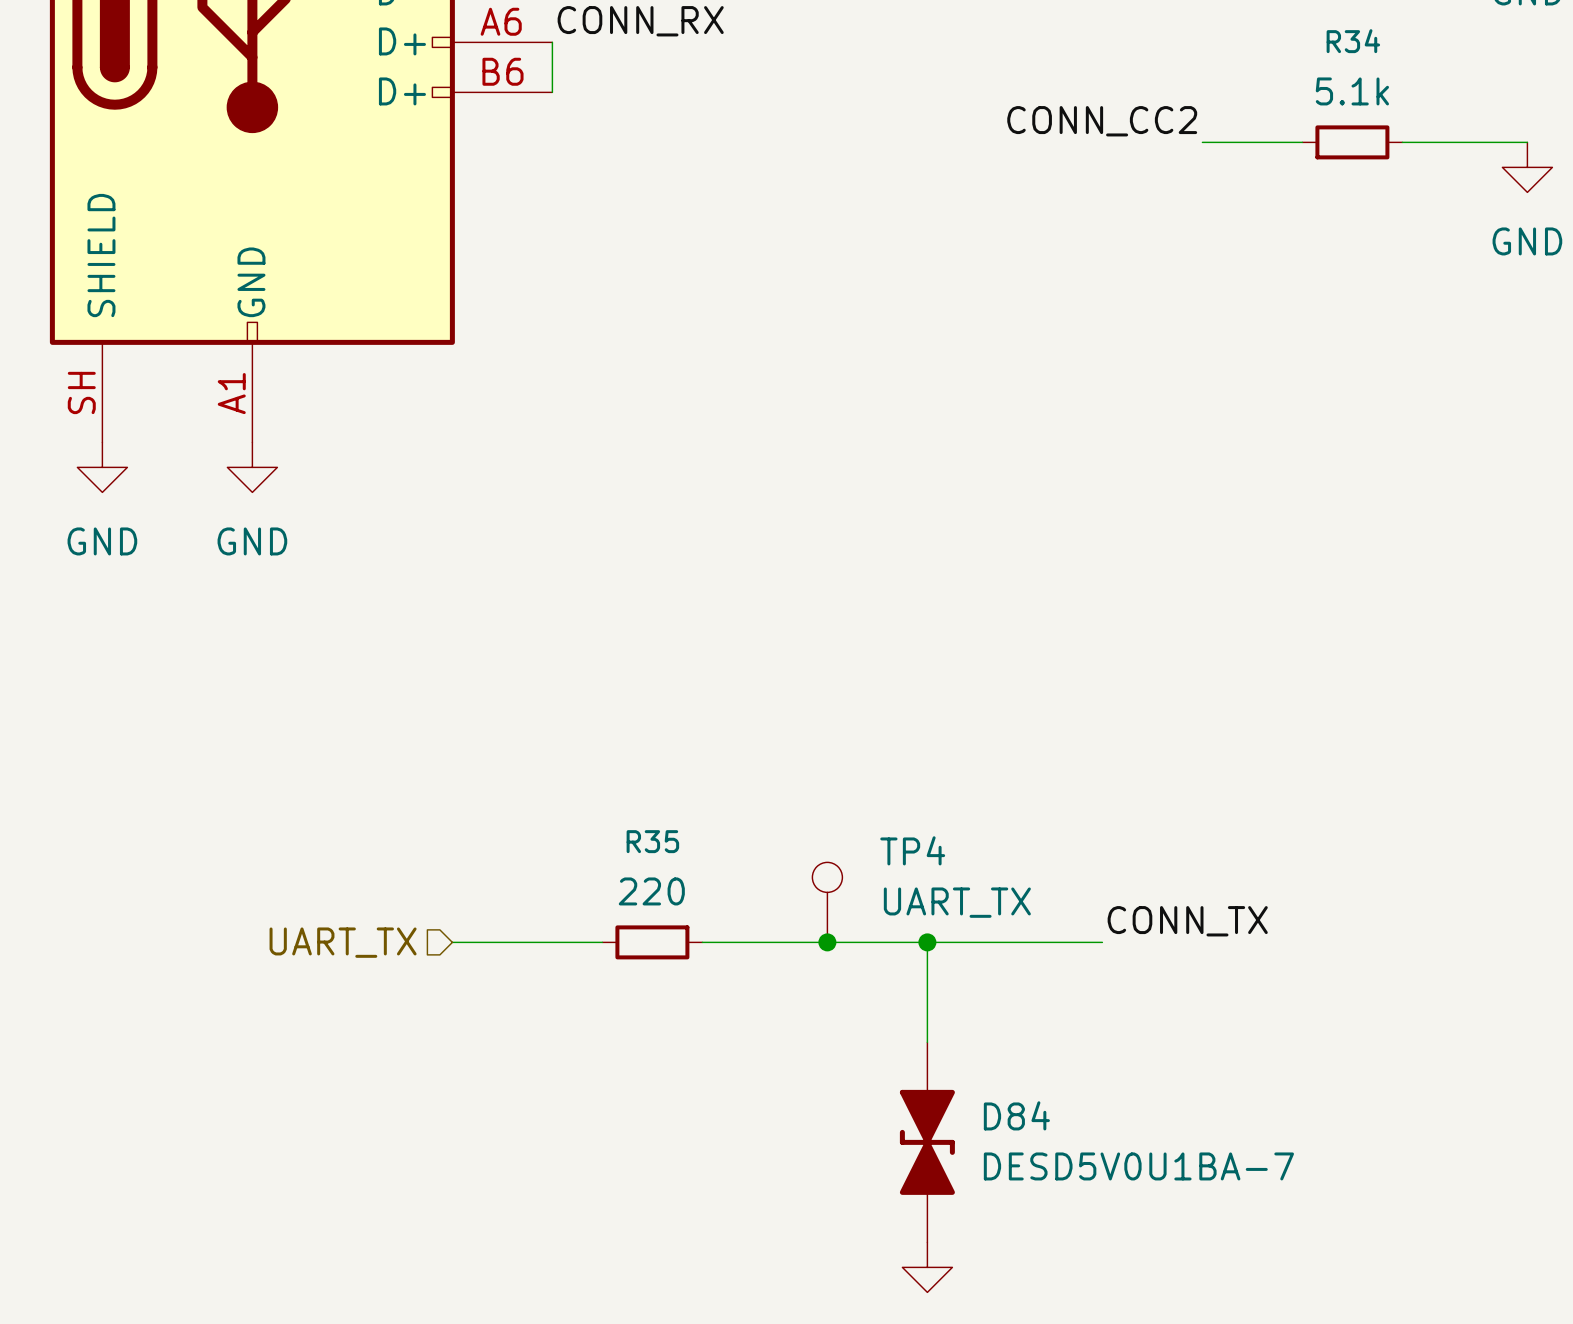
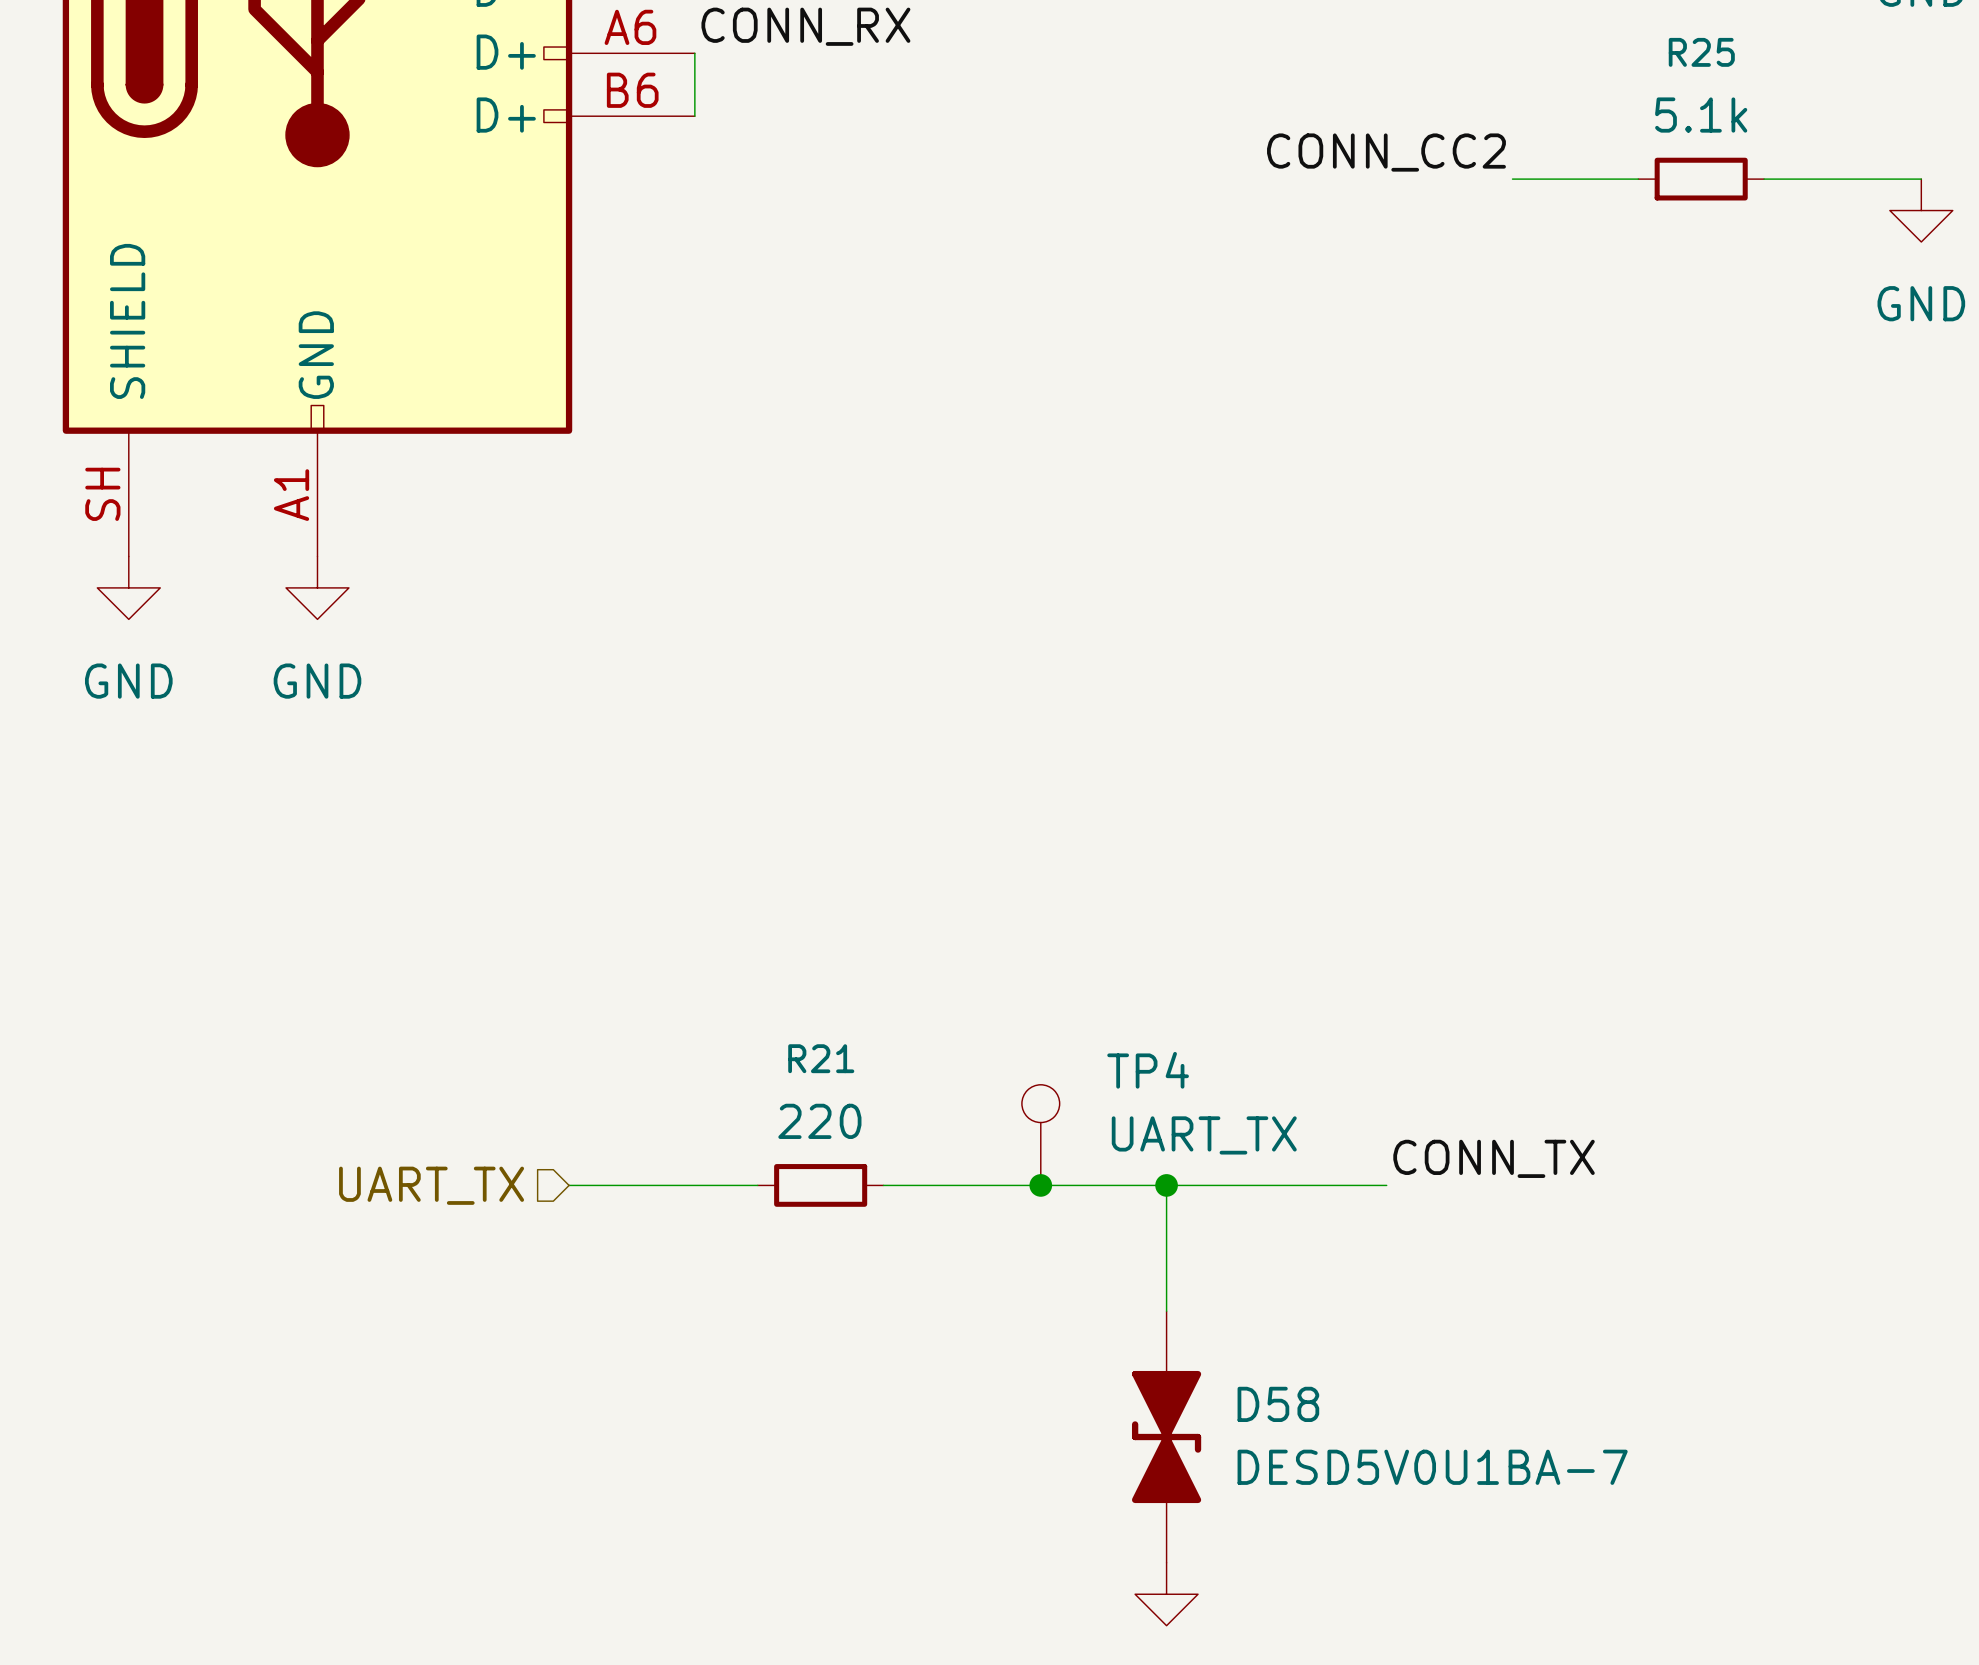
R34 name: R34 (1353, 41) -> R25 (1701, 52)
R35 name: R35 (652, 841) -> R21 (821, 1058)
D84 name: D84 (1016, 1115) -> D58 (1278, 1404)

